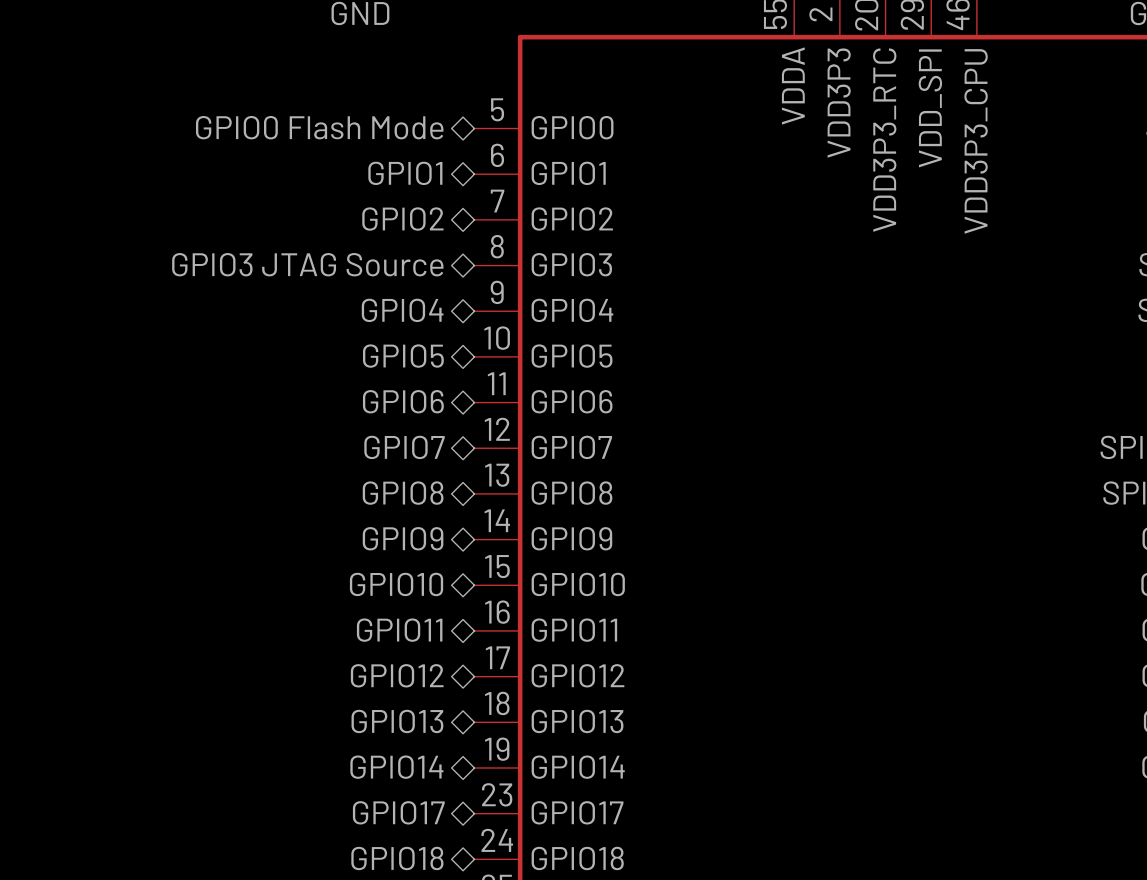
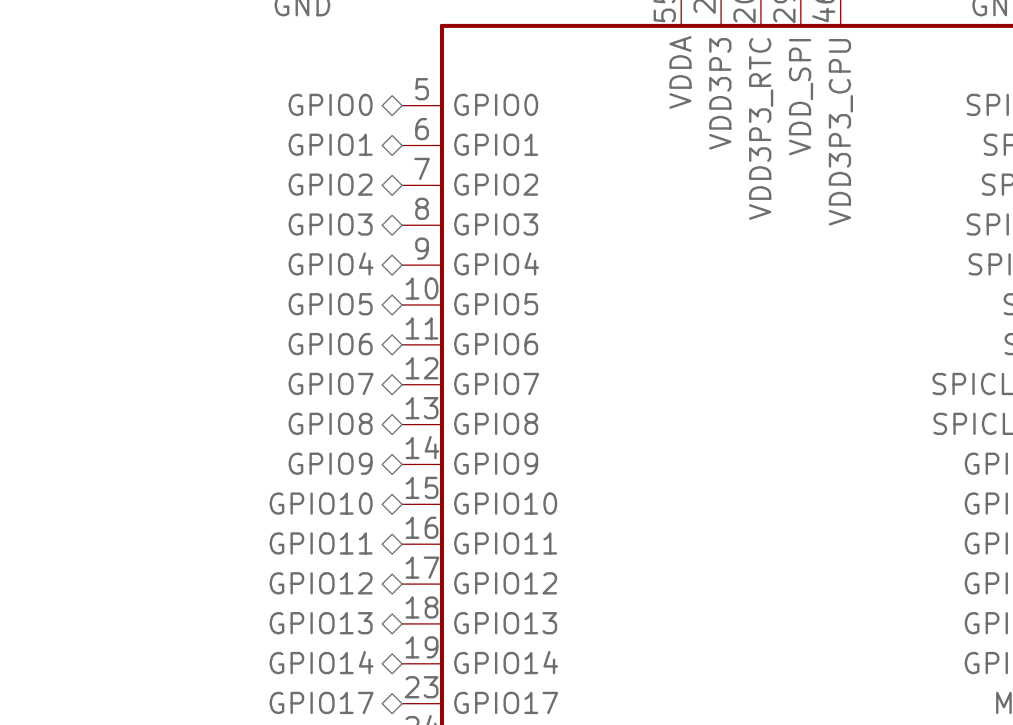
hierarchical label: GPIO0 Flash Mode (319, 127) -> GPIO0 (330, 104)
hierarchical label: GPIO3 JTAG Source (307, 264) -> GPIO3 (330, 224)

